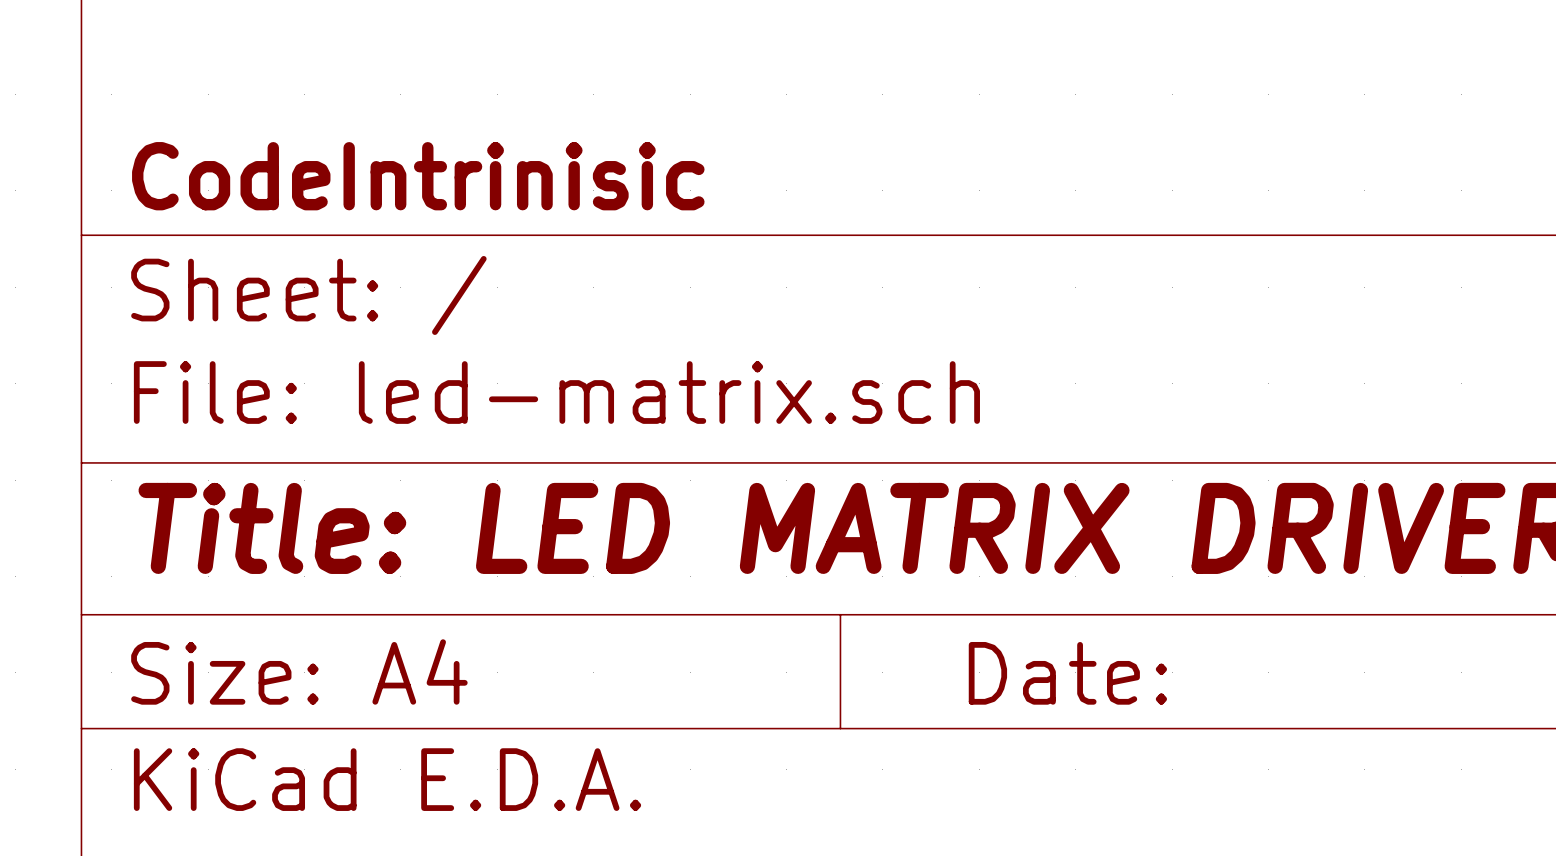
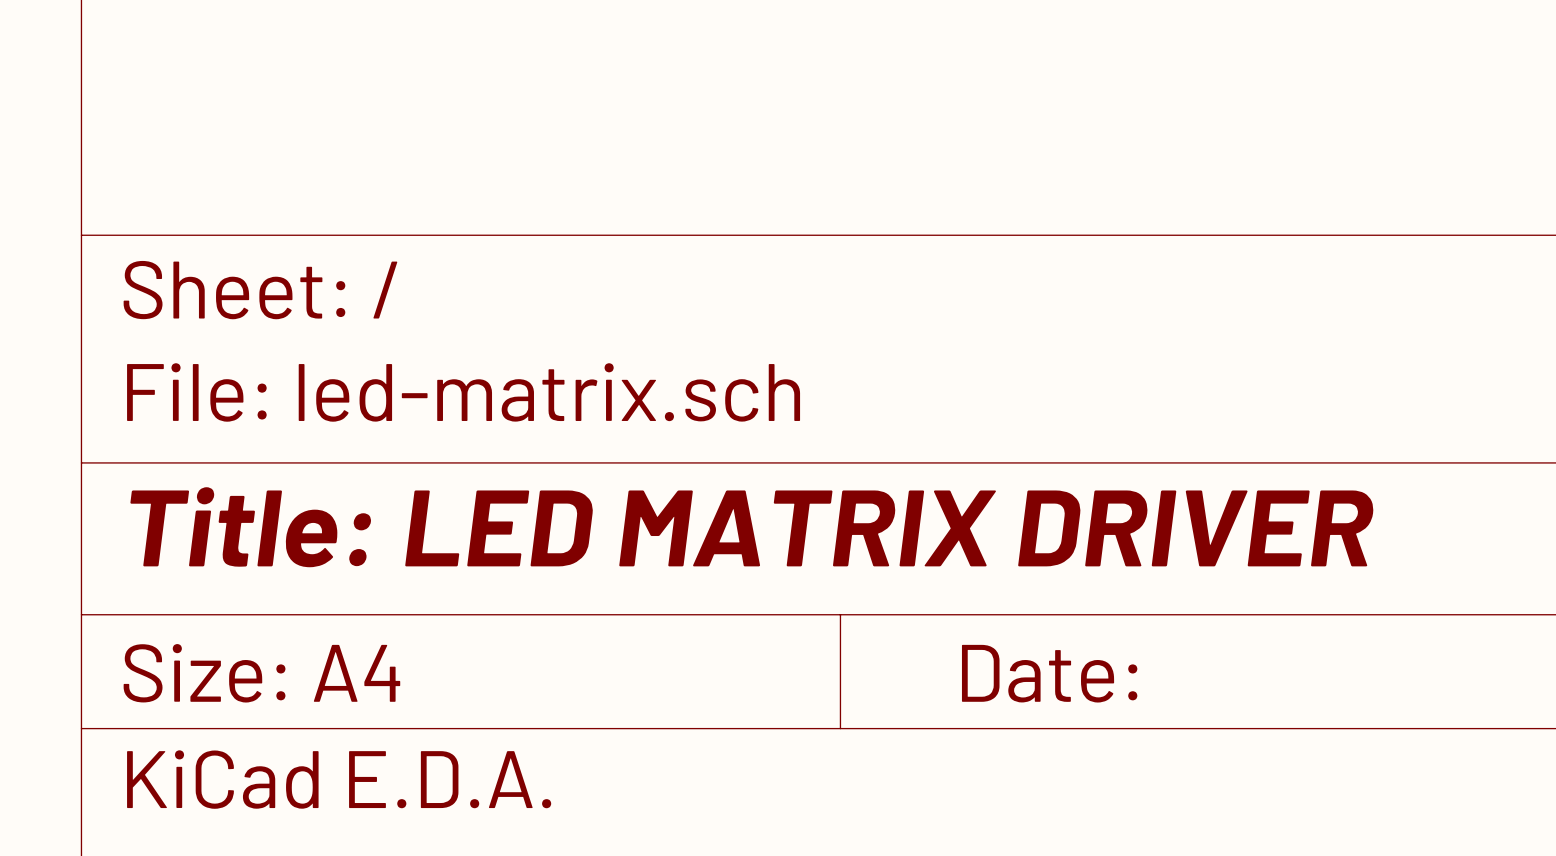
title block: CodeIntrinisic (418, 176) -> none

